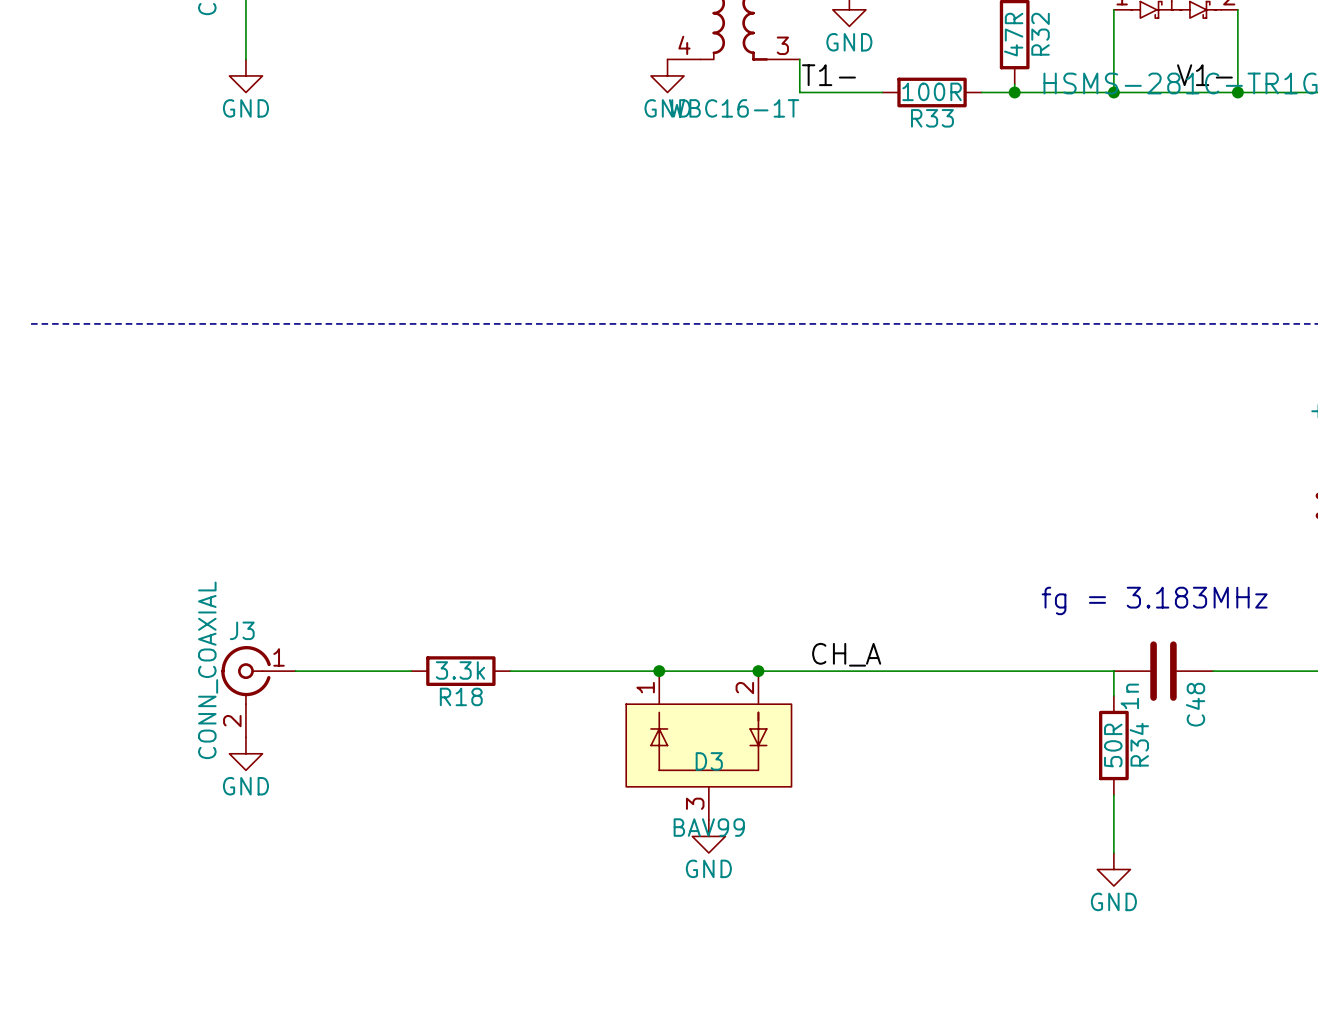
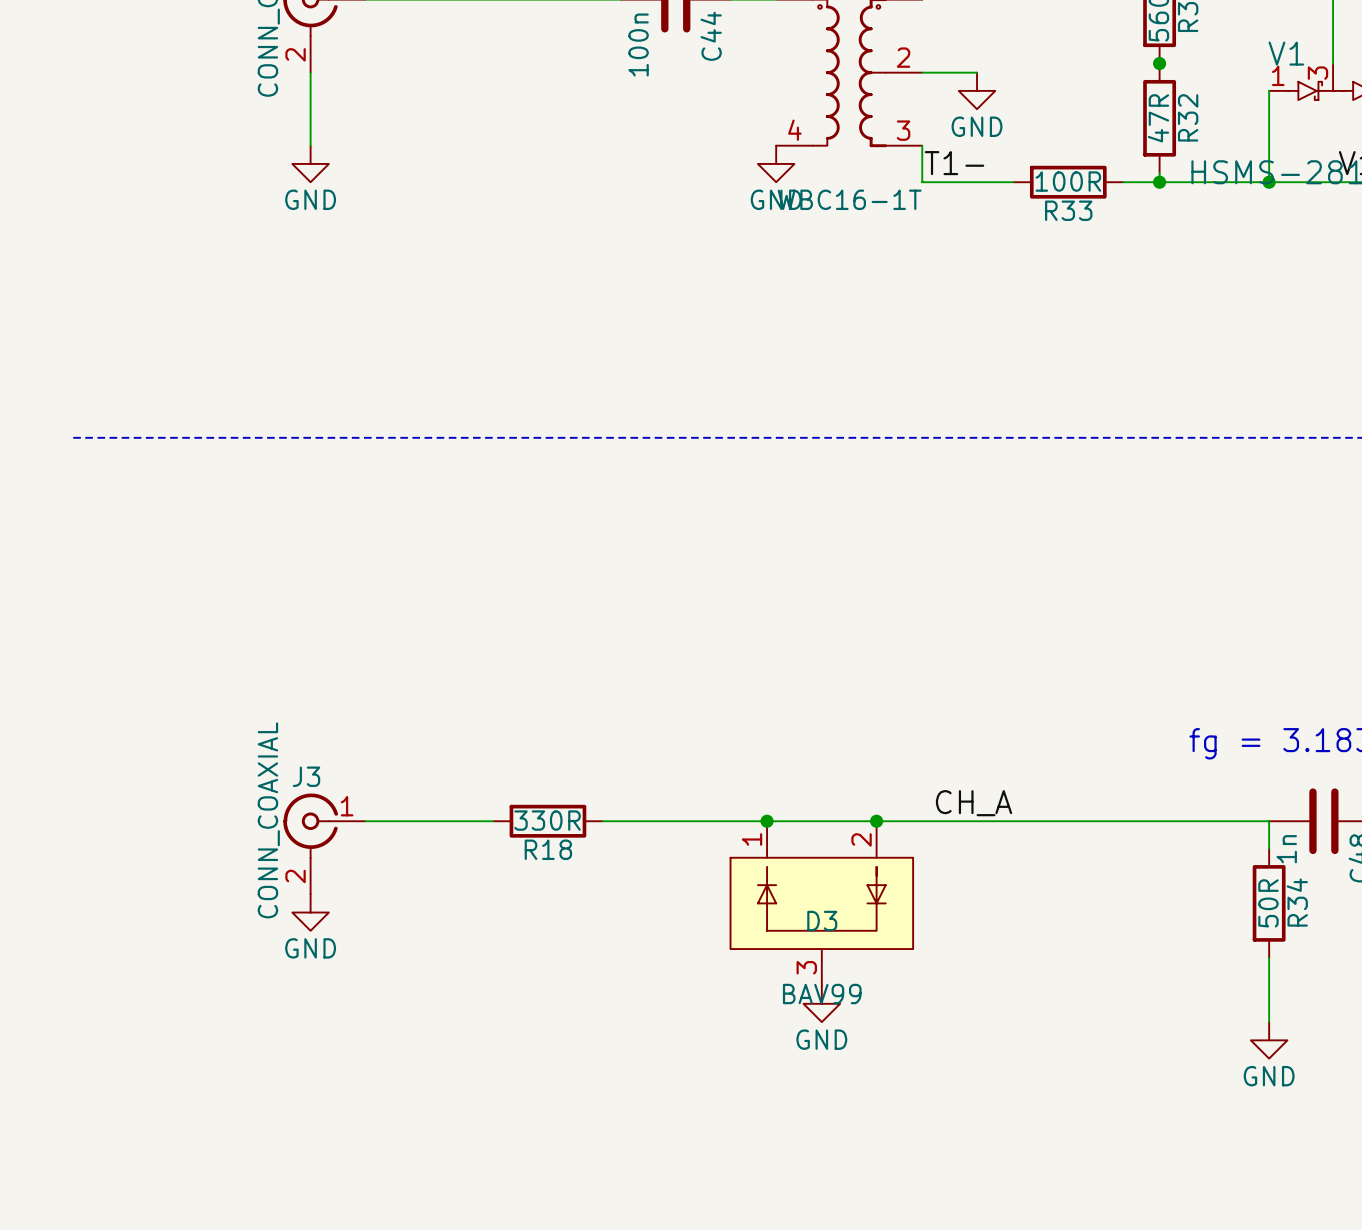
R18 value: 3.3k (460, 670) -> 330R (547, 820)

